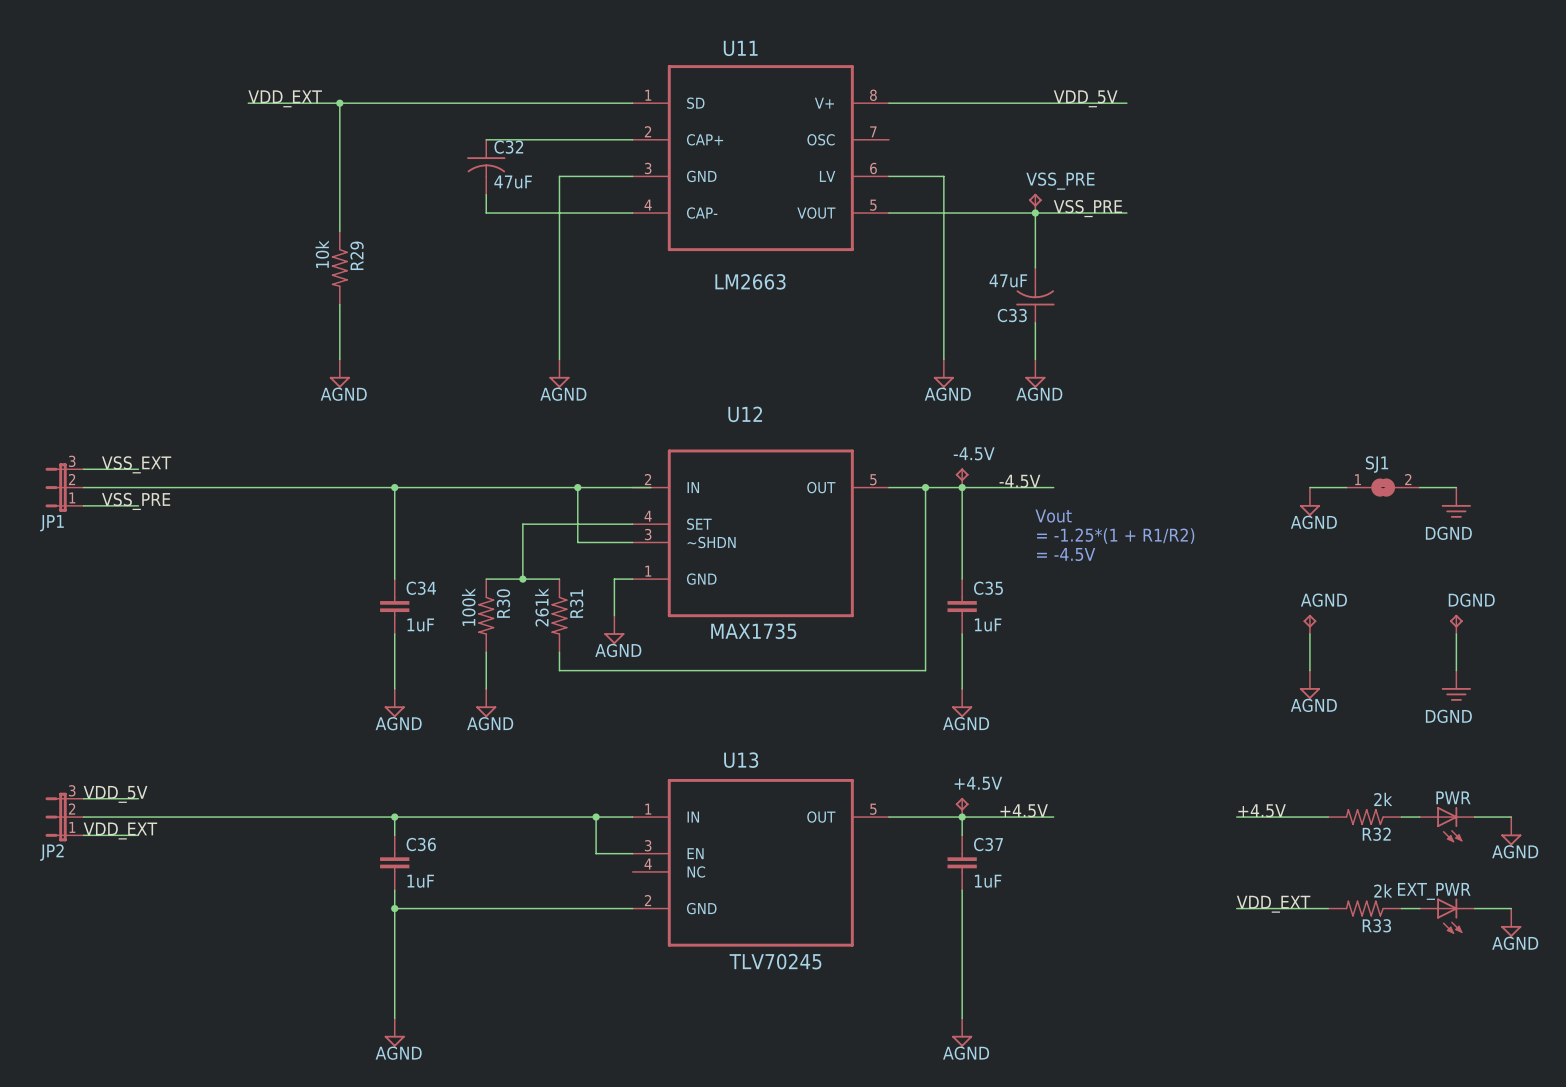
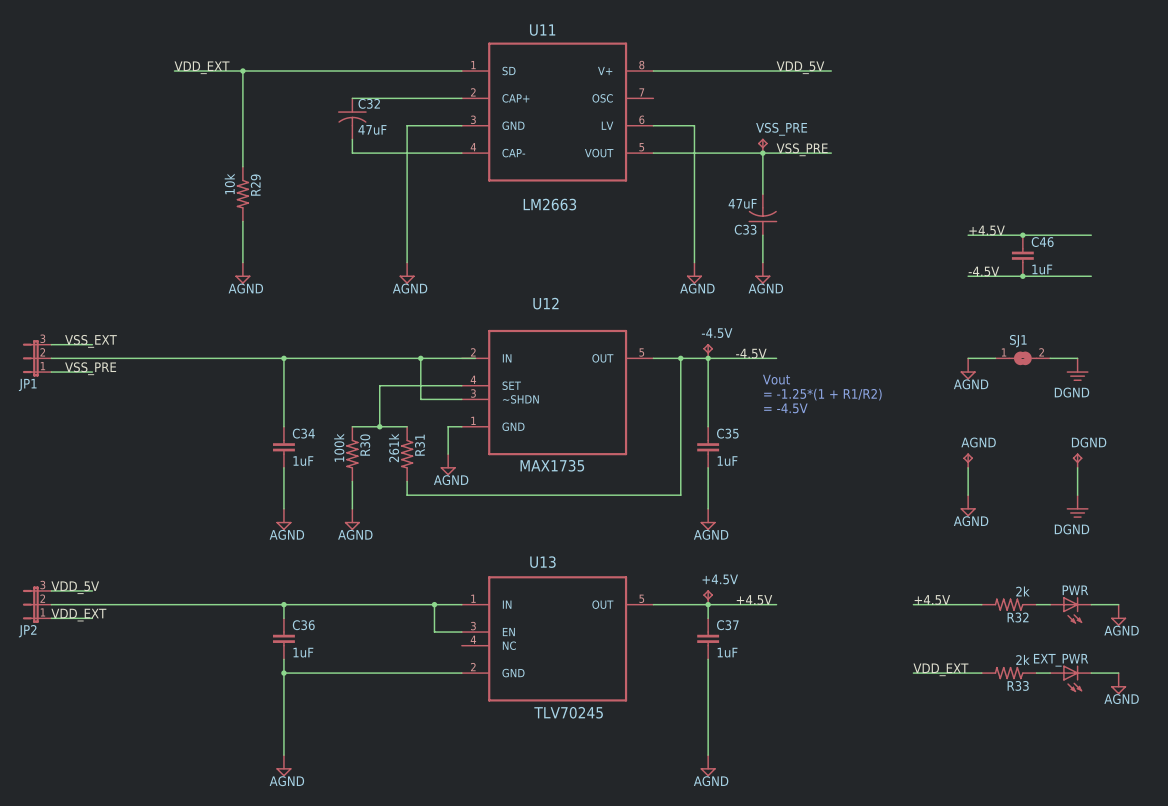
label: none -> +4.5V (987, 230)
wire: none -> (968, 235) (1091, 235)
junction: none -> (1022, 235)
C46: none -> 1uF (1022, 255)
label: none -> -4.5V (983, 271)
wire: none -> (968, 276) (1091, 276)
junction: none -> (1022, 276)

